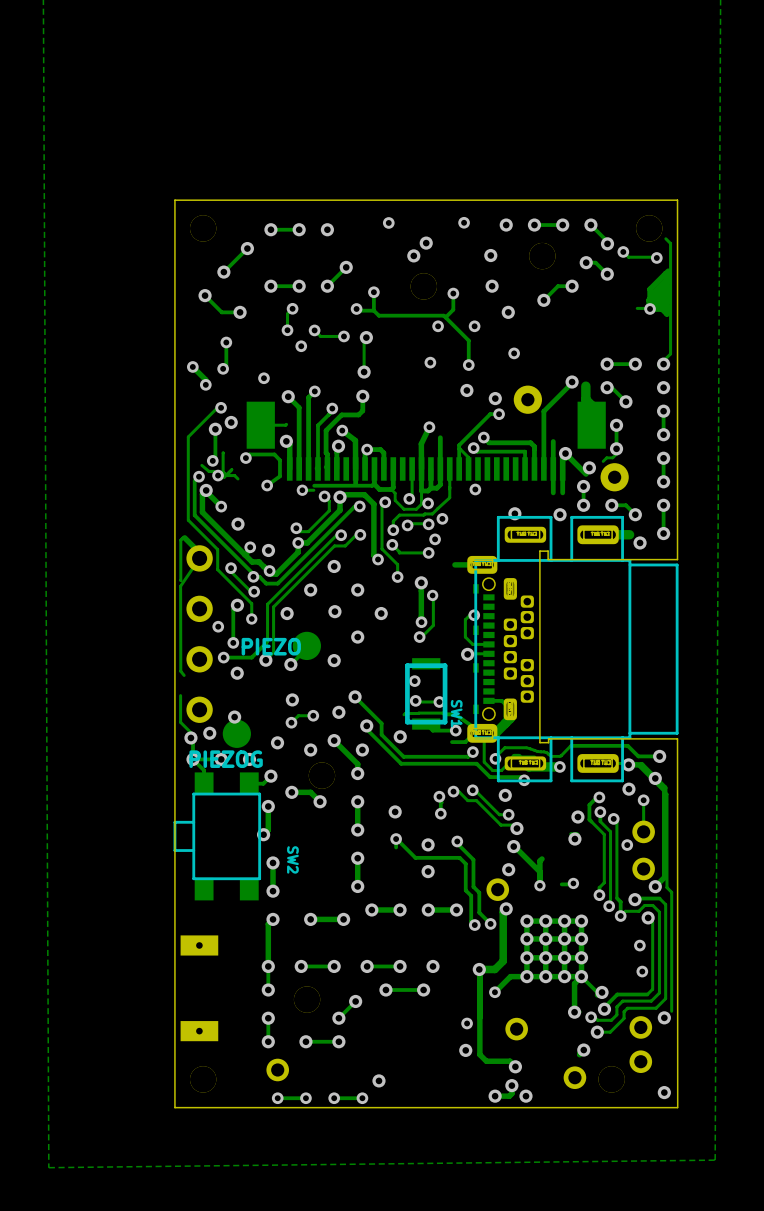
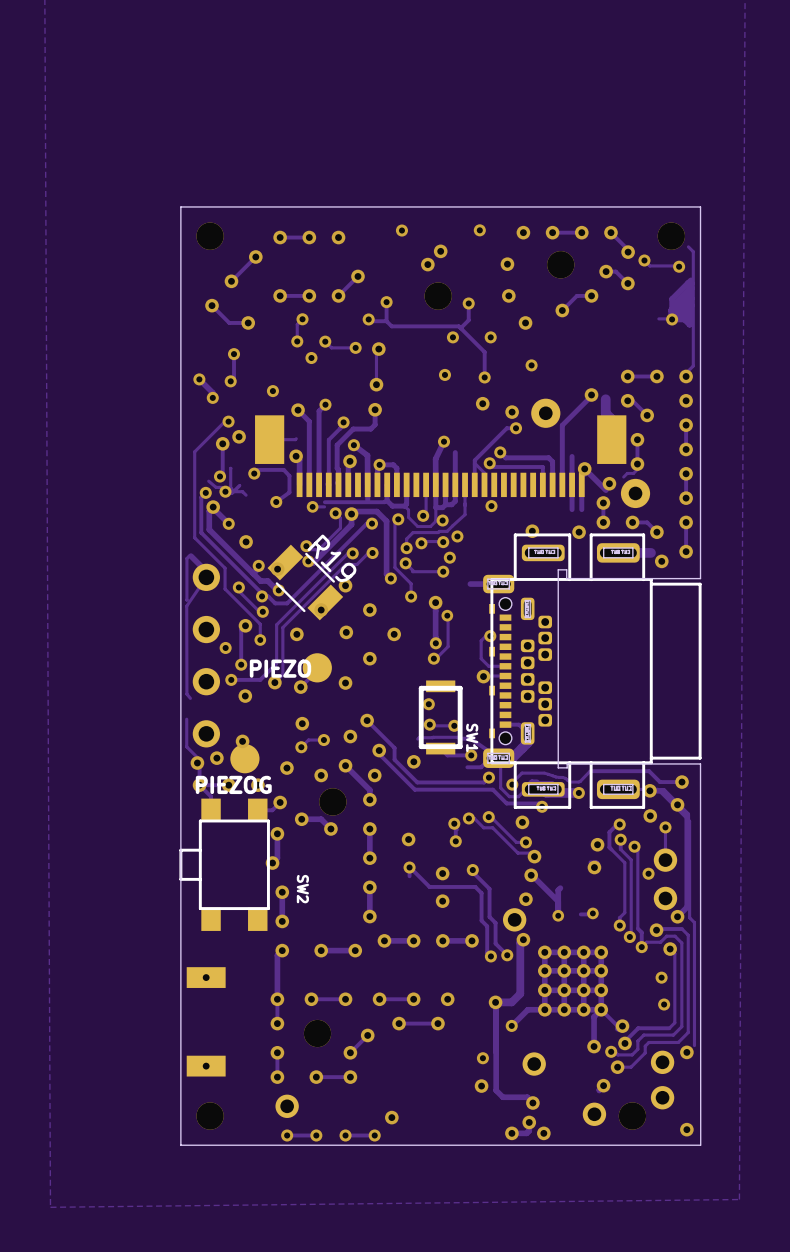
track: (340, 507) (340, 510) (307, 542) (298, 542) (298, 552) (276, 574) (271, 574) -> (351, 524) (313, 563) (310, 563)
R19: none -> (305, 582)

